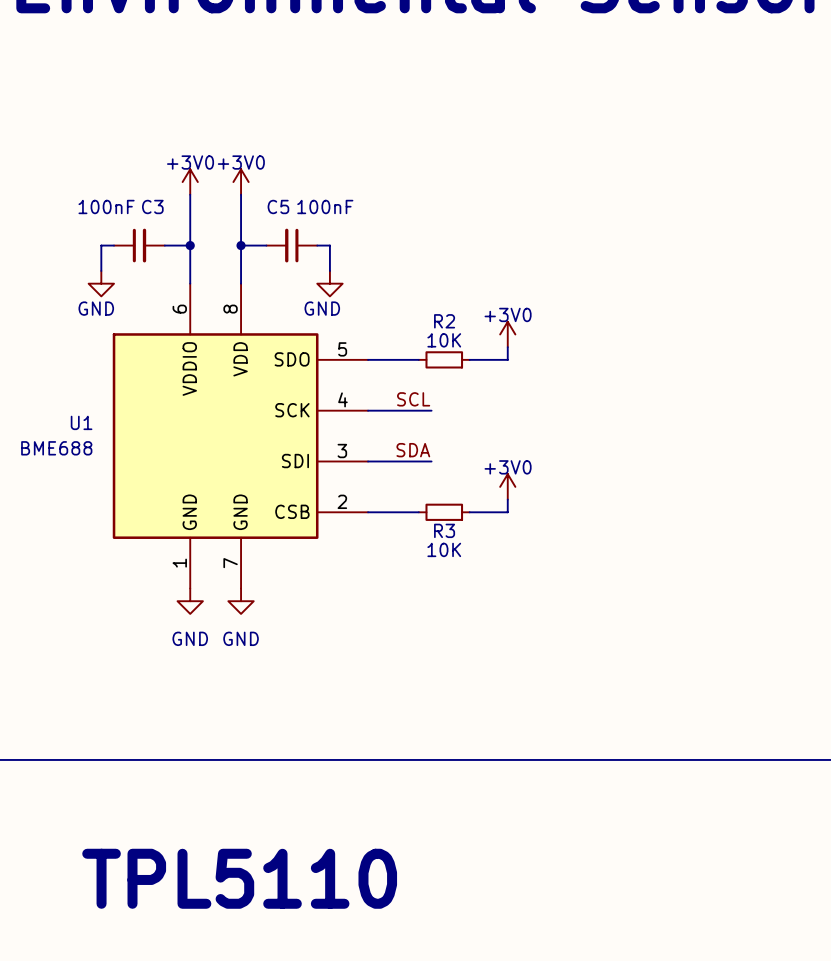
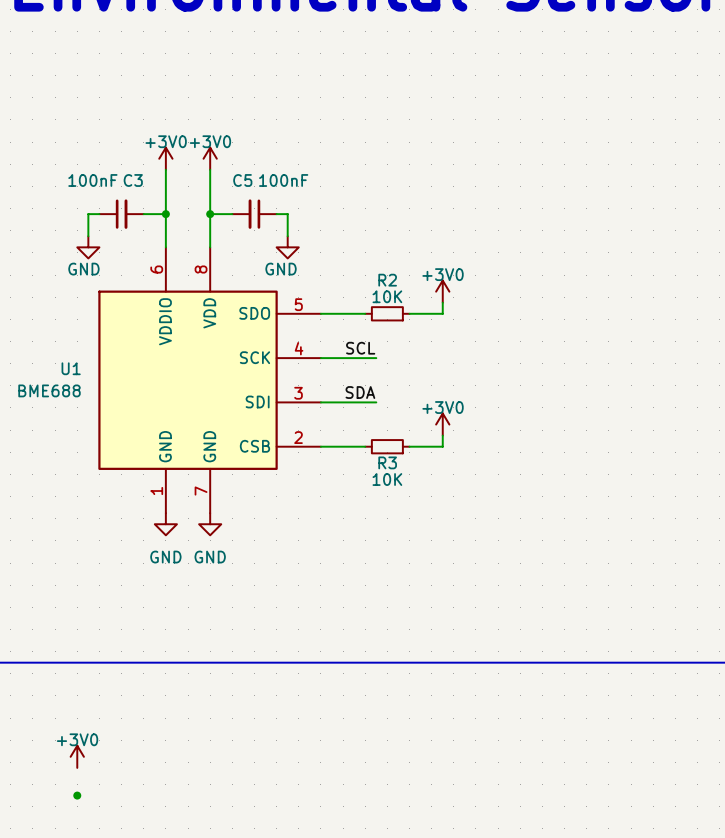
power symbol: none -> +3V0 (77, 756)
text: TPL5110 (239, 878) -> none
junction: none -> (77, 795)

